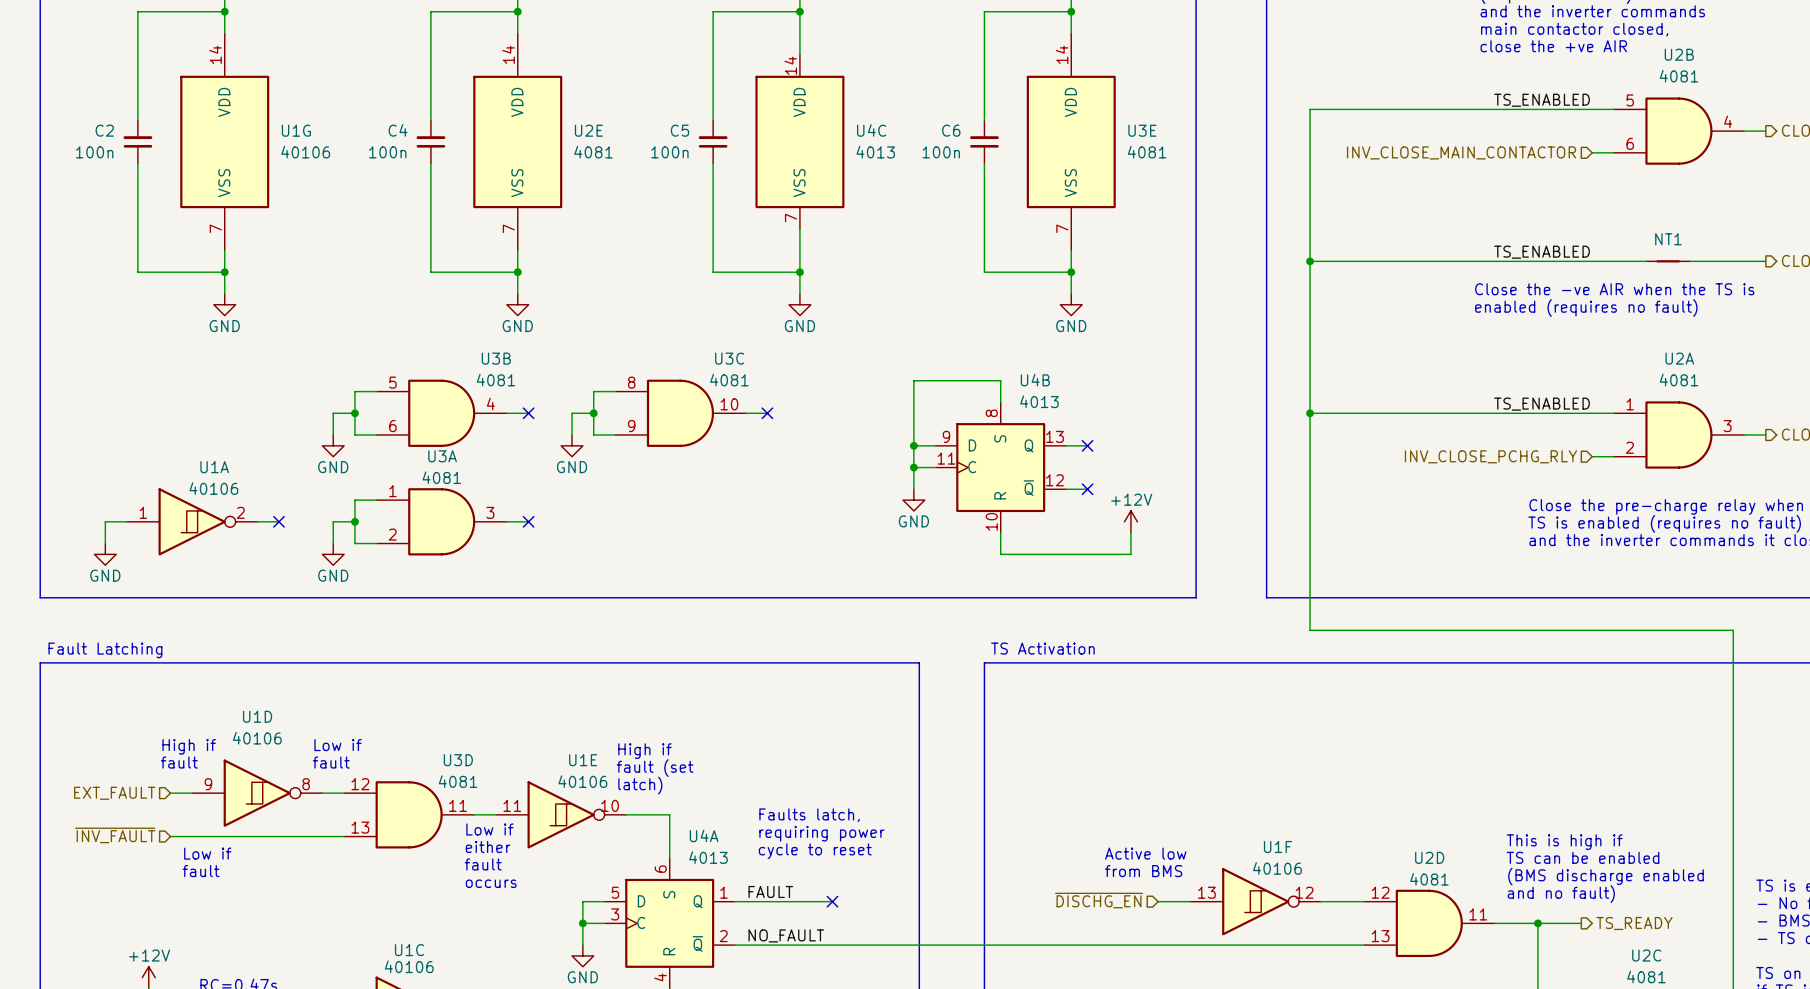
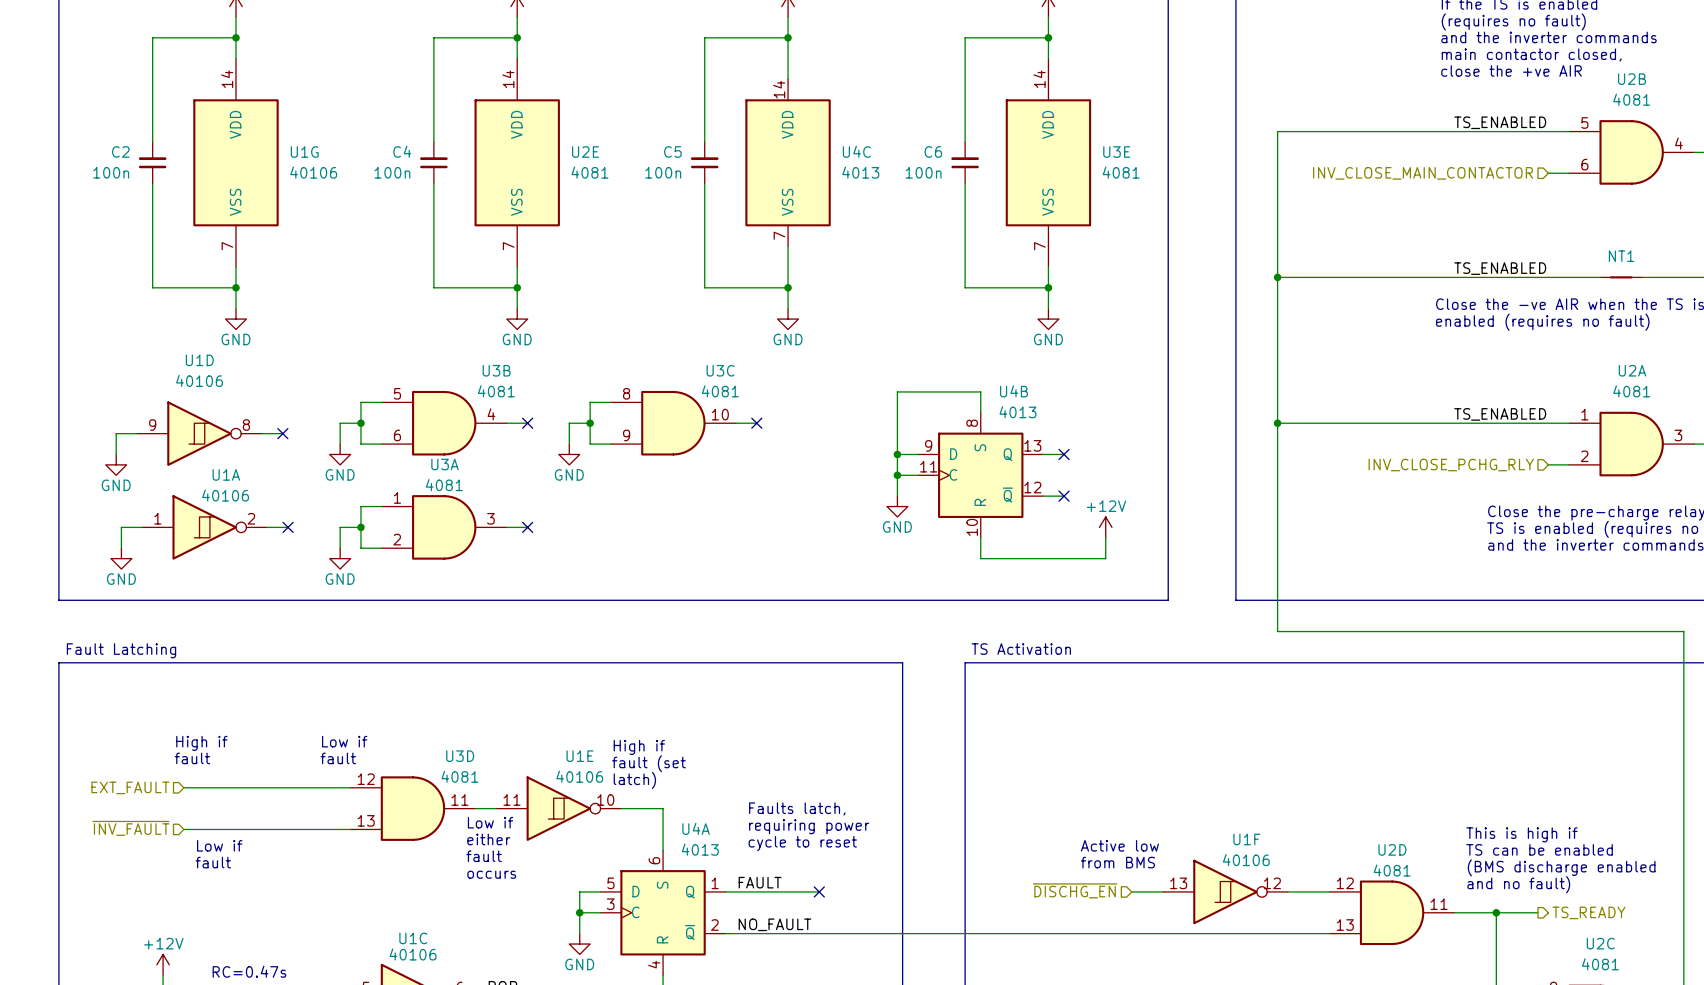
wire: none -> (137, 433) (116, 433) (116, 454)
wire: none -> (262, 433) (282, 433)
no-connect mark: none -> (282, 433)
power symbol: none -> GND (116, 464)
U1D position: (257, 793) -> (199, 433)

